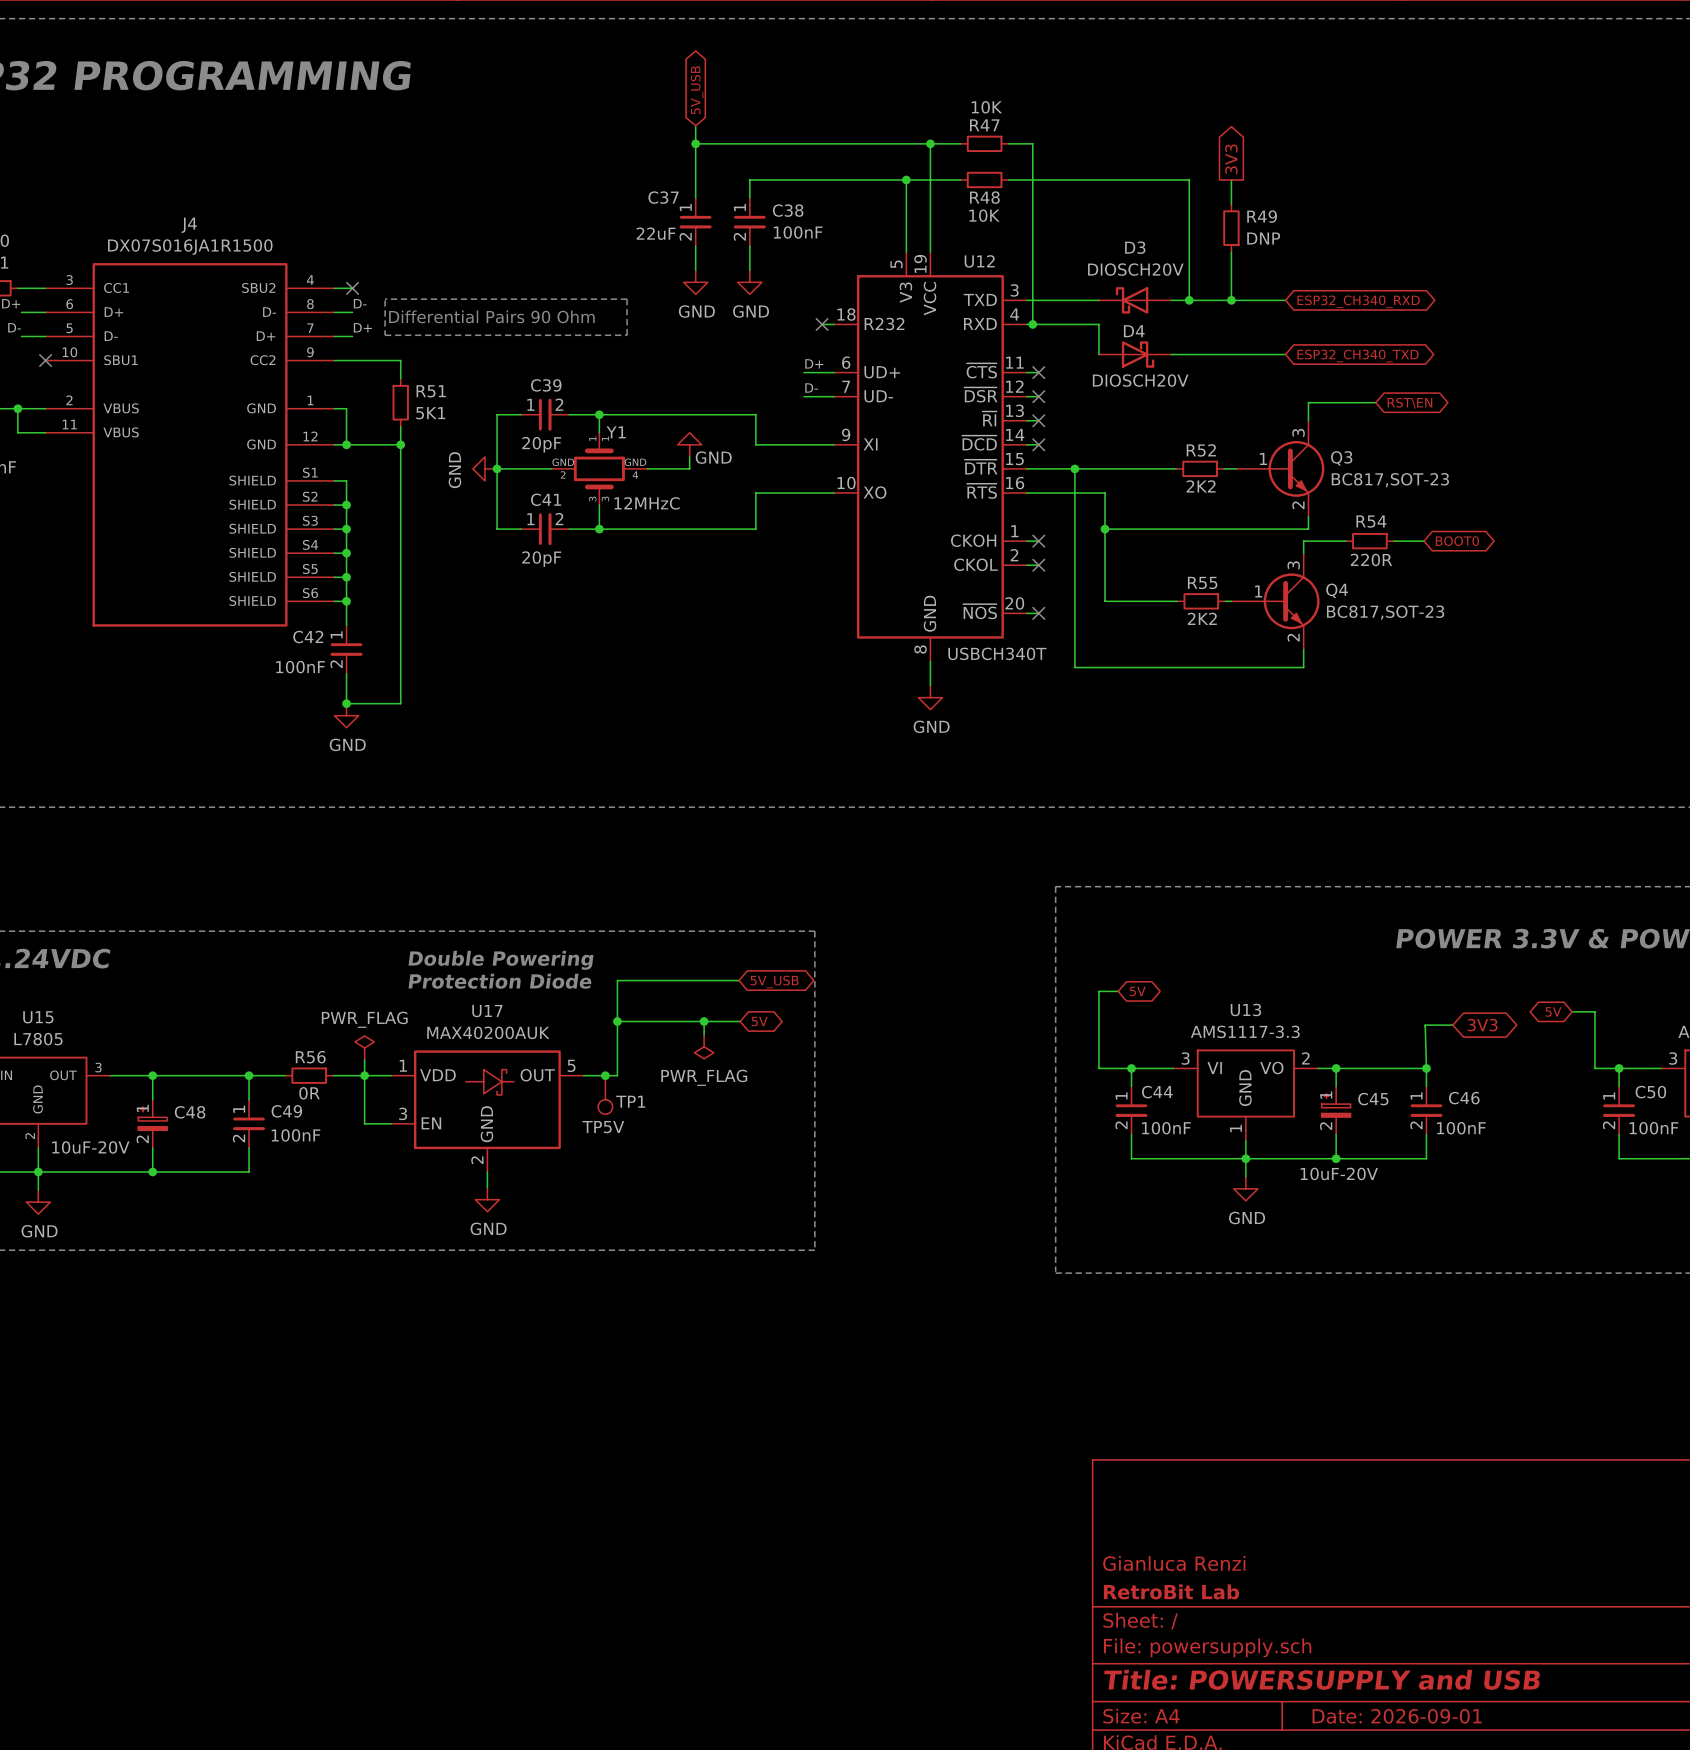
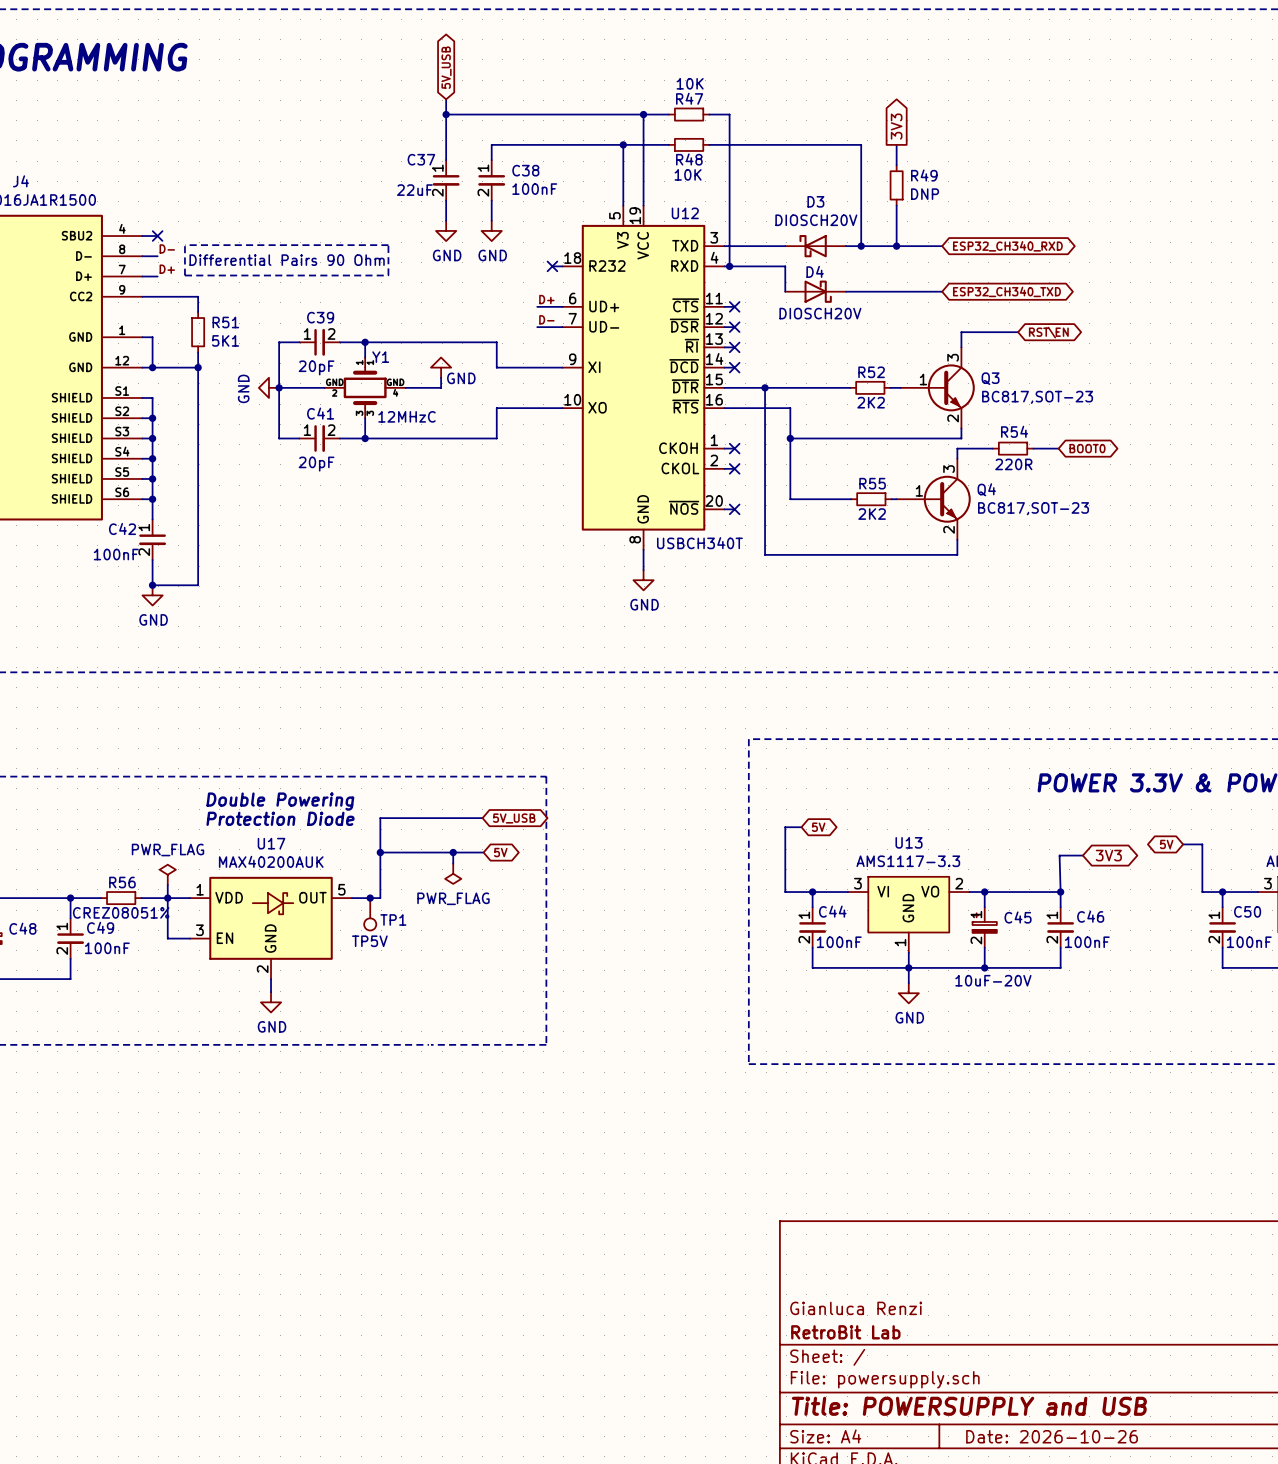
R56 value: 0R (309, 1093) -> CREZ08051% (121, 912)
title block: Date: 2026-09-01 (1397, 1716) -> Date: 2026-10-26 (1052, 1436)

